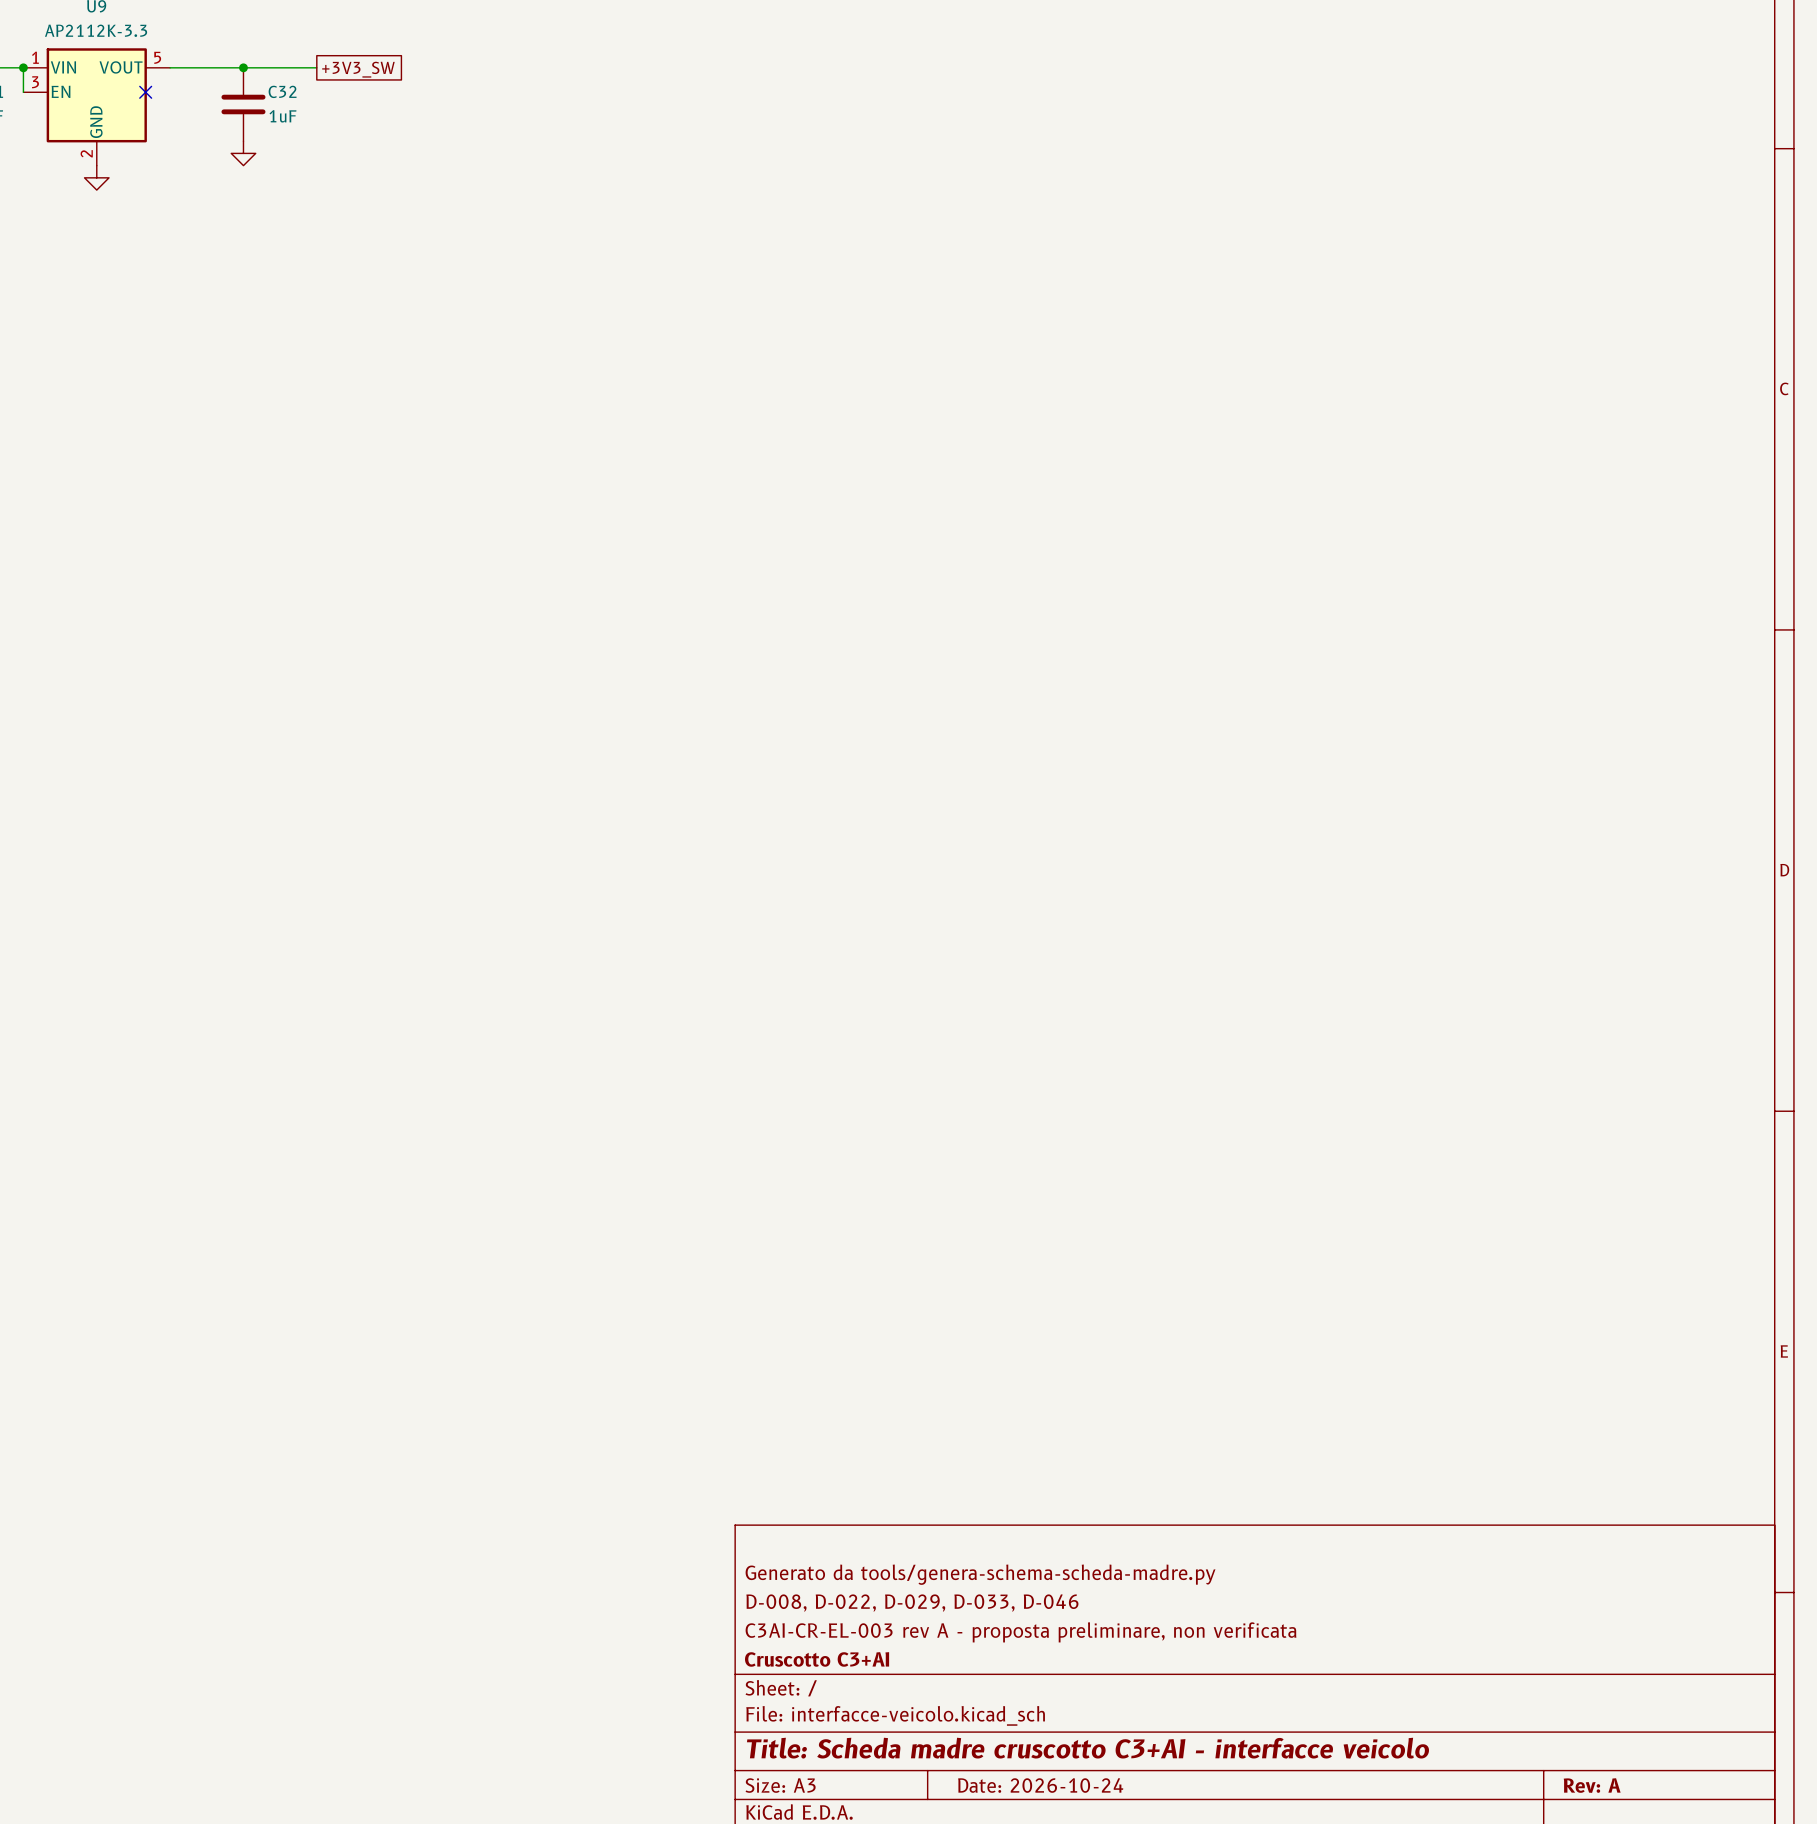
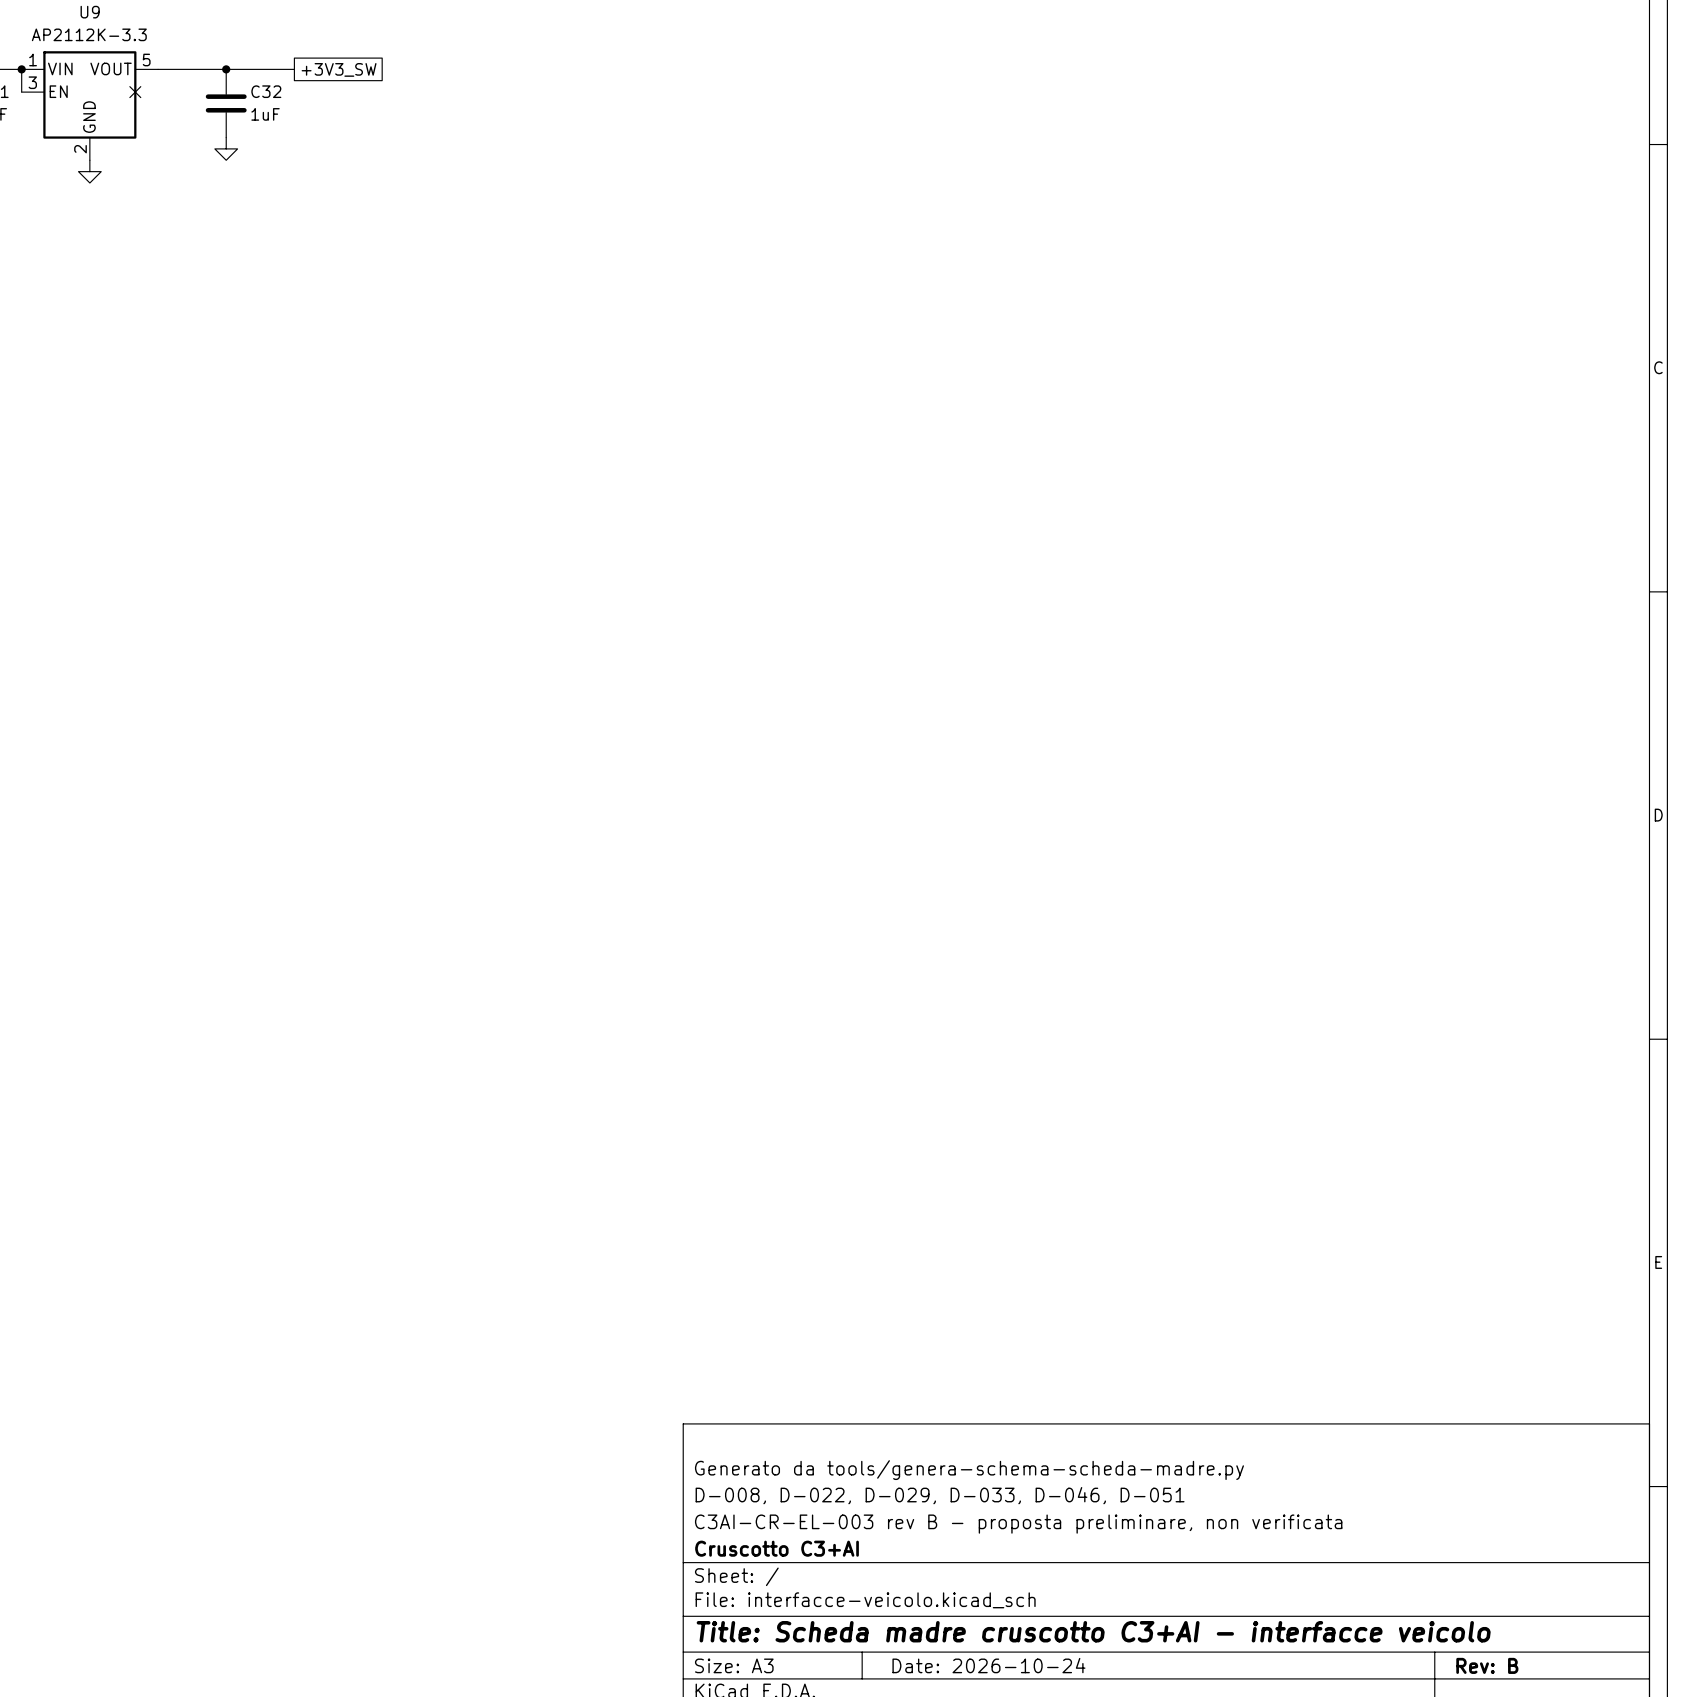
title block: D-008, D-022, D-029, D-033, D-046 (912, 1603) -> D-008, D-022, D-029, D-033, D-046, D-051 (940, 1495)
title block: C3AI-CR-EL-003 rev A - proposta preliminare, non verificata (1020, 1632) -> C3AI-CR-EL-003 rev B - proposta preliminare, non verificata (1018, 1524)
title block: Rev: A (1592, 1785) -> Rev: B (1487, 1665)

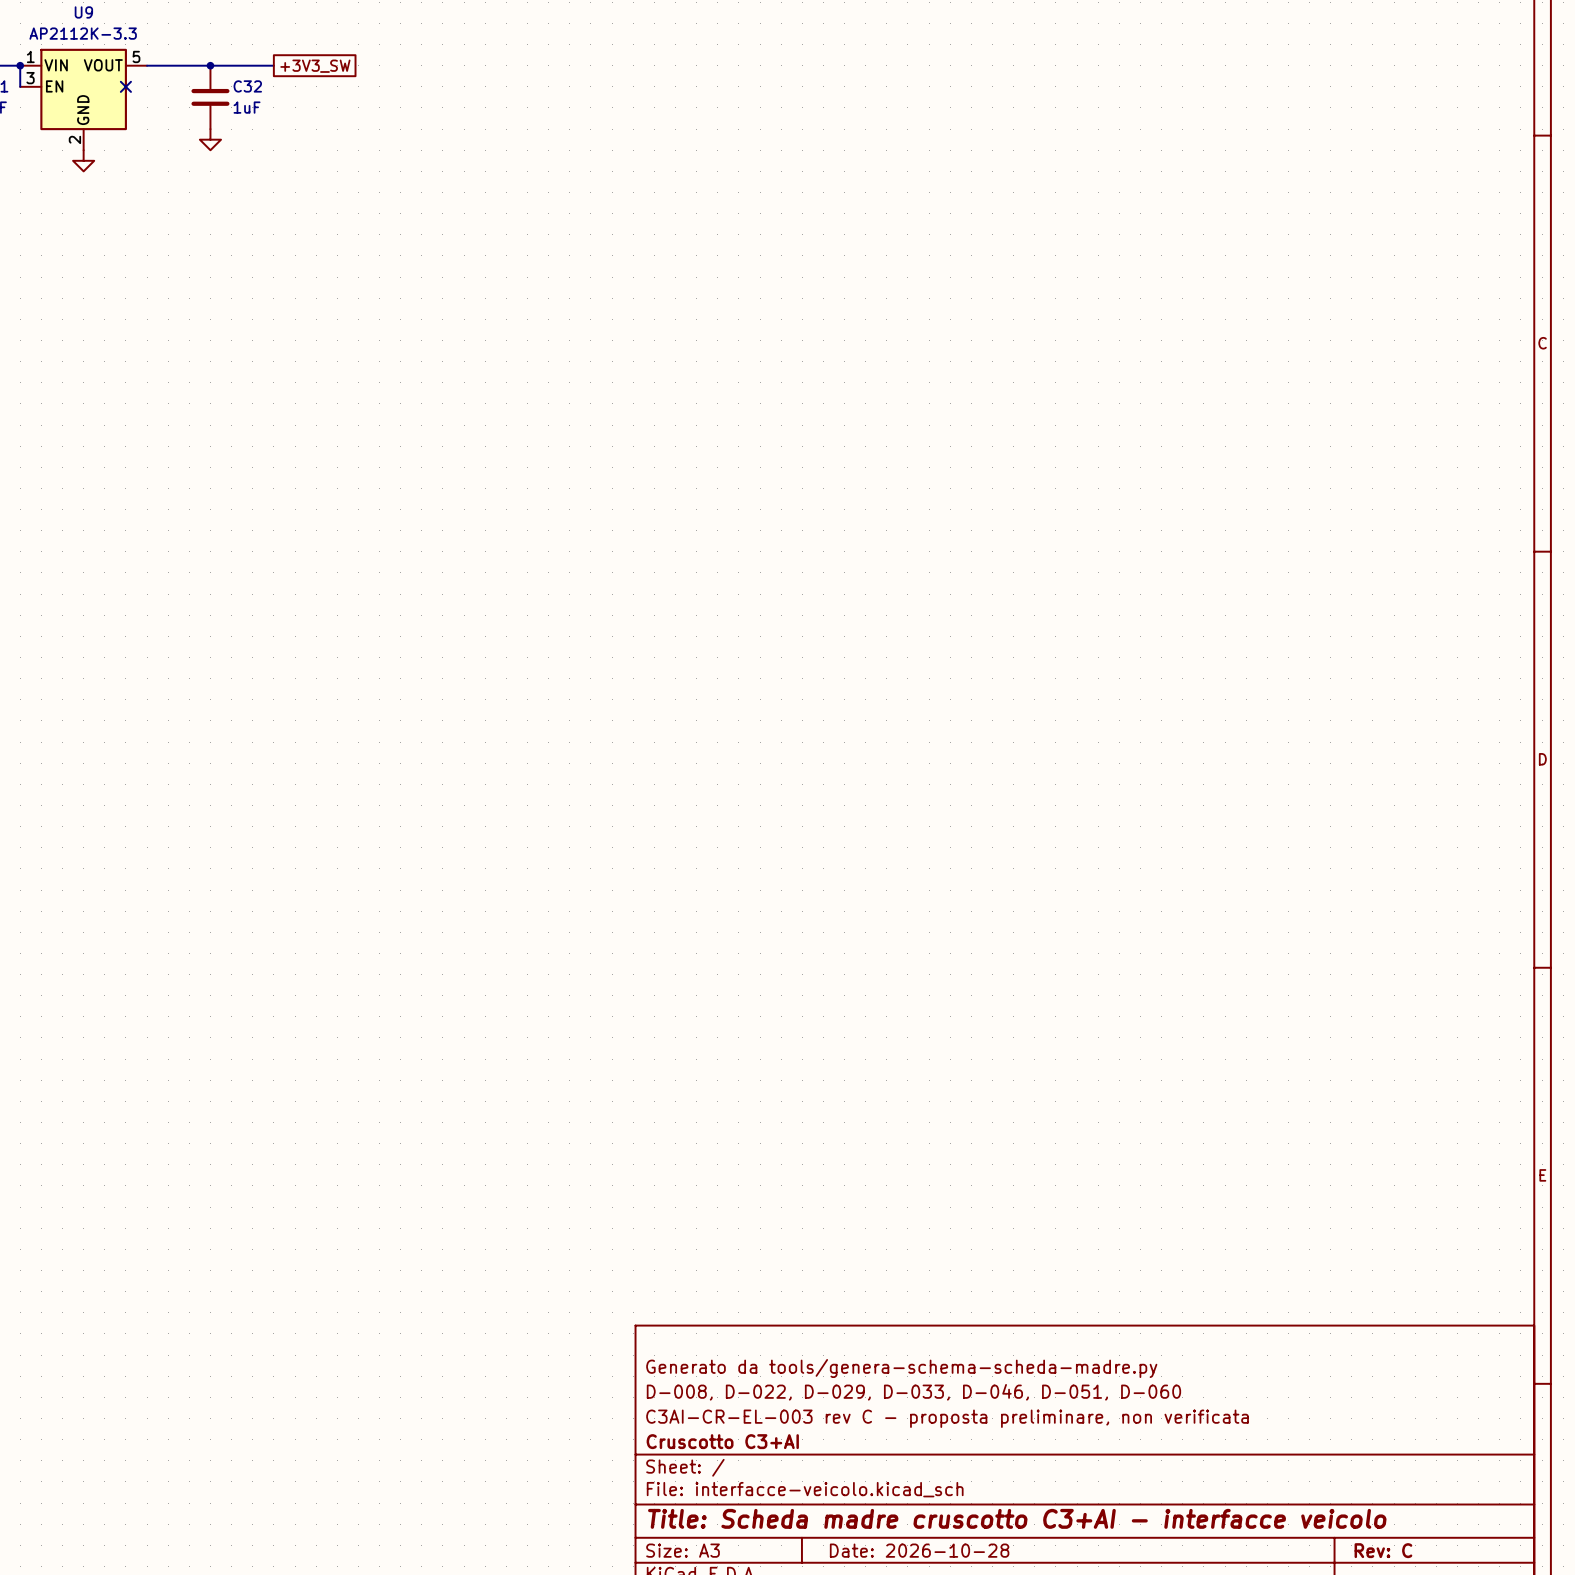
title block: D-008, D-022, D-029, D-033, D-046, D-051 (940, 1495) -> D-008, D-022, D-029, D-033, D-046, D-051, D-060 (913, 1392)
title block: C3AI-CR-EL-003 rev B - proposta preliminare, non verificata (1018, 1524) -> C3AI-CR-EL-003 rev C - proposta preliminare, non verificata (947, 1418)
title block: Date: 2026-10-24 (988, 1665) -> Date: 2026-10-28 (919, 1550)
title block: Rev: B (1487, 1665) -> Rev: C (1383, 1550)

